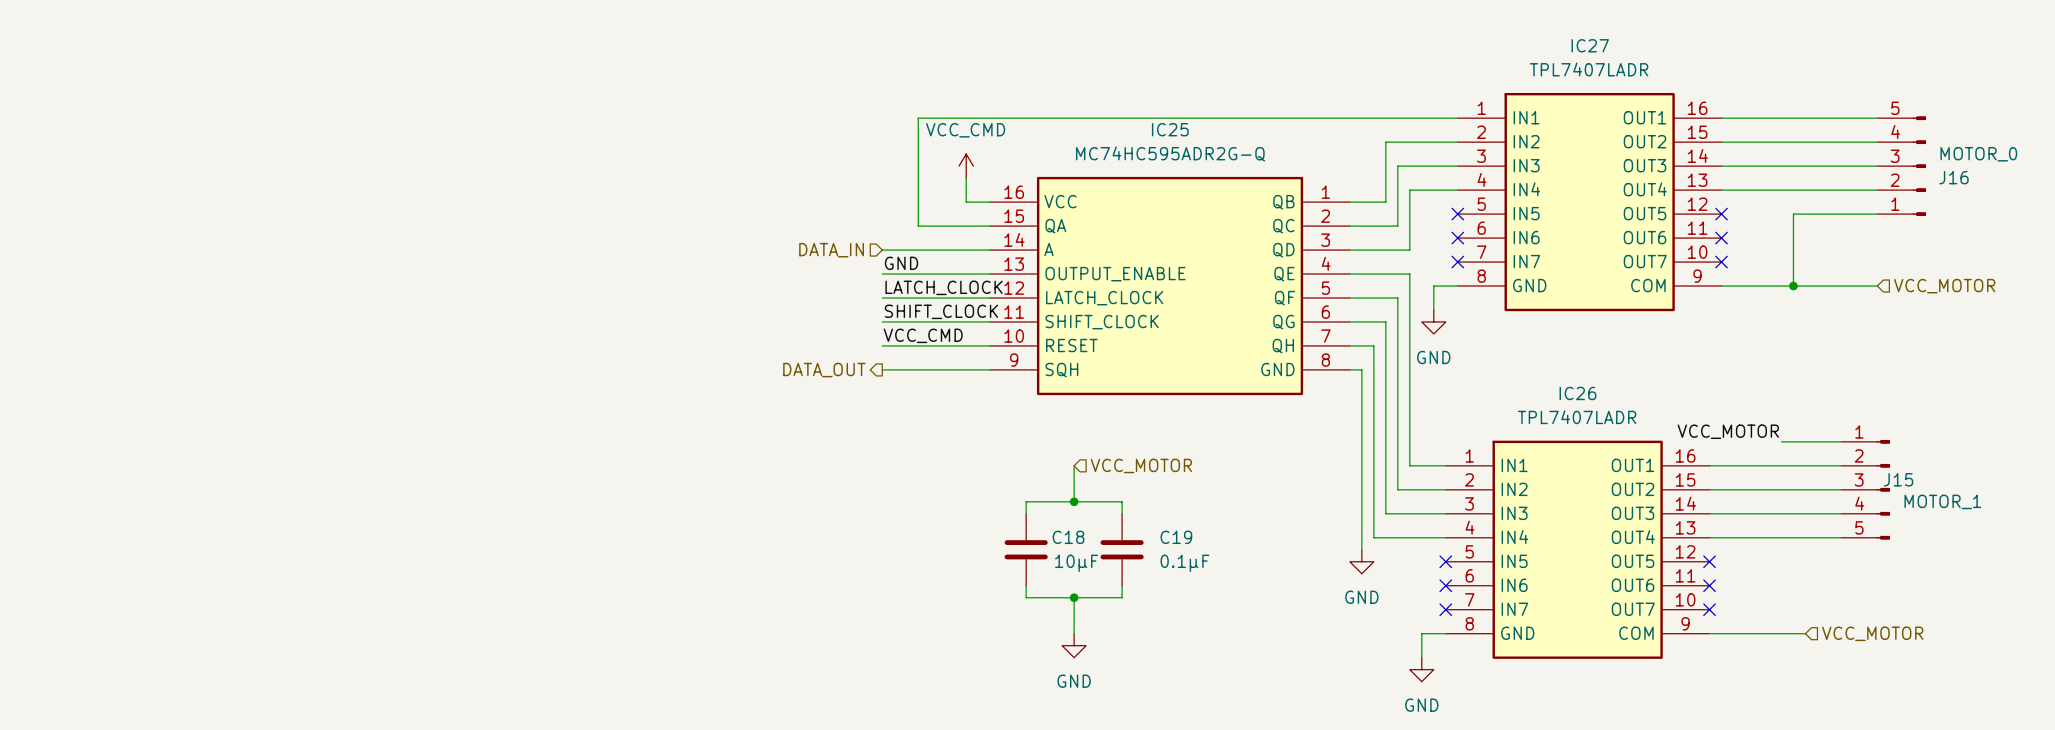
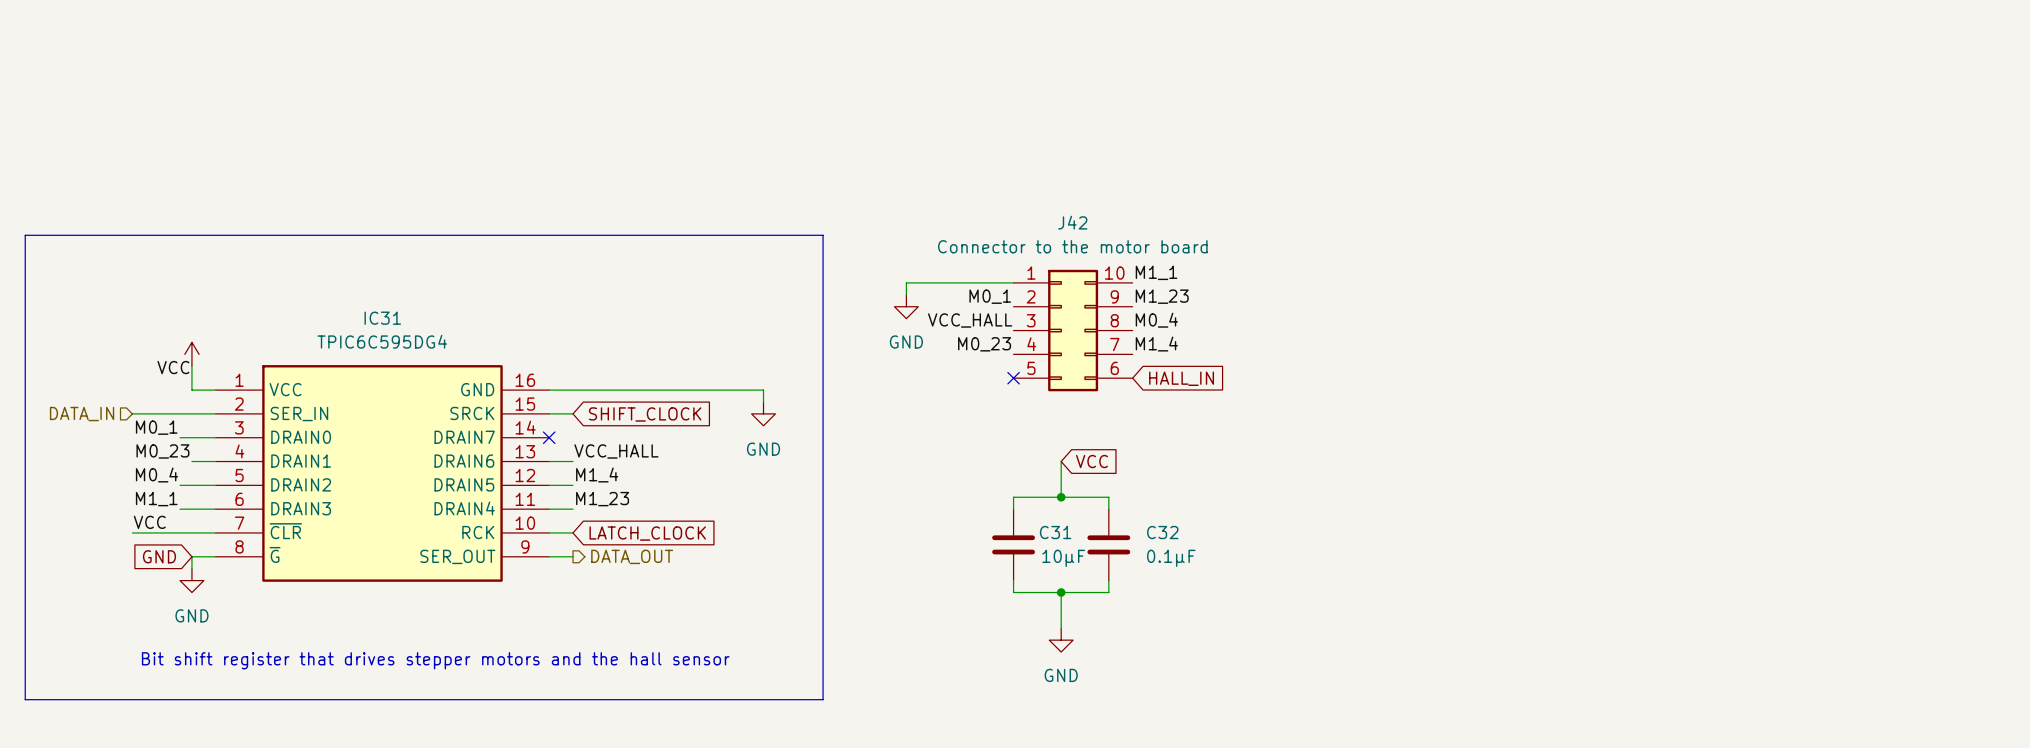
wire: (1457, 118) (918, 118) (918, 226) (990, 226) -> none
wire: (1721, 118) (1877, 118) -> none
wire: (1457, 142) (1385, 142) (1385, 202) (1349, 202) -> none
wire: (1721, 142) (1877, 142) -> none
power symbol: VCC_CMD (966, 166) -> none
wire: (1457, 166) (1397, 166) (1397, 226) (1349, 226) -> none
wire: (1721, 166) (1877, 166) -> none
J16: MOTOR_0 (1901, 166) -> none
wire: (966, 178) (966, 202) (990, 202) -> none
wire: (1457, 190) (1409, 190) (1409, 250) (1349, 250) -> none
wire: (1721, 190) (1877, 190) -> none
IC27: TPL7407LADR (1589, 202) -> none
no-connect mark: (1457, 214) -> none
no-connect mark: (1721, 214) -> none
wire: (1877, 214) (1793, 214) (1793, 286) -> none
line: none -> (25, 235) (823, 235) (823, 699) (25, 699) (25, 235)
no-connect mark: (1457, 238) -> none
no-connect mark: (1721, 238) -> none
hierarchical label: DATA_IN (831, 250) -> none
wire: (882, 250) (990, 250) -> none
no-connect mark: (1457, 262) -> none
no-connect mark: (1721, 262) -> none
label: GND (901, 263) -> none
wire: (882, 274) (990, 274) -> none
wire: (1349, 274) (1409, 274) (1409, 465) (1445, 465) -> none
label: none -> M1_1 (1156, 272)
wire: none -> (1013, 282) (906, 282) (906, 294)
IC25: MC74HC595ADR2G-Q (1170, 286) -> none
wire: (1457, 286) (1433, 286) (1433, 309) -> none
wire: (1721, 286) (1877, 286) -> none
junction: (1793, 286) -> none
hierarchical label: VCC_MOTOR (1944, 286) -> none
label: LATCH_CLOCK (944, 287) -> none
wire: (882, 298) (990, 298) -> none
wire: (1349, 298) (1397, 298) (1397, 489) (1445, 489) -> none
label: none -> M0_1 (990, 296)
label: none -> M1_23 (1162, 296)
power symbol: none -> GND (906, 306)
label: SHIFT_CLOCK (941, 311) -> none
wire: (882, 321) (990, 321) -> none
wire: (1349, 321) (1385, 321) (1385, 513) (1445, 513) -> none
power symbol: GND (1433, 321) -> none
label: none -> VCC_HALL (970, 320)
label: none -> M0_4 (1156, 320)
J42: none -> Connector to the motor board (1073, 330)
label: VCC_CMD (923, 335) -> none
wire: (882, 345) (990, 345) -> none
wire: (1349, 345) (1373, 345) (1373, 537) (1445, 537) -> none
label: none -> M0_23 (984, 344)
label: none -> M1_4 (1156, 344)
power symbol: none -> (191, 354)
wire: none -> (191, 366) (191, 390) (215, 390)
wire: (882, 369) (990, 369) -> none
wire: (1349, 369) (1361, 369) (1361, 549) -> none
hierarchical label: DATA_OUT (824, 370) -> none
label: none -> VCC (173, 367)
no-connect mark: none -> (1013, 378)
global label: none -> HALL_IN (1181, 378)
wire: none -> (549, 390) (763, 390) (763, 401)
wire: none -> (132, 413) (215, 413)
wire: none -> (549, 413) (572, 413)
power symbol: none -> GND (763, 413)
hierarchical label: none -> DATA_IN (82, 414)
global label: none -> SHIFT_CLOCK (645, 414)
label: none -> M0_1 (156, 427)
label: VCC_MOTOR (1728, 431) -> none
wire: none -> (180, 437) (215, 437)
no-connect mark: none -> (549, 437)
wire: (1781, 441) (1841, 441) -> none
label: none -> M0_23 (162, 451)
label: none -> VCC_HALL (616, 451)
wire: none -> (191, 461) (215, 461)
wire: none -> (549, 461) (572, 461)
global label: none -> VCC (1091, 461)
hierarchical label: VCC_MOTOR (1141, 465) -> none
wire: (1709, 465) (1841, 465) -> none
IC31: none -> TPIC6C595DG4 (382, 473)
label: none -> M0_4 (157, 475)
label: none -> M1_4 (597, 475)
wire: none -> (180, 485) (215, 485)
wire: none -> (549, 485) (572, 485)
wire: (1709, 489) (1841, 489) -> none
J15: MOTOR_1 (1865, 489) -> none
label: none -> M1_1 (156, 499)
label: none -> M1_23 (602, 499)
wire: none -> (180, 509) (215, 509)
wire: none -> (549, 509) (572, 509)
wire: (1709, 513) (1841, 513) -> none
label: none -> VCC (149, 522)
wire: none -> (132, 532) (215, 532)
wire: none -> (549, 532) (572, 532)
C18 name: C18 (1068, 537) -> C31 (1055, 532)
C19 name: C19 (1176, 537) -> C32 (1162, 532)
wire: (1709, 537) (1841, 537) -> none
global label: none -> LATCH_CLOCK (647, 533)
IC26: TPL7407LADR (1577, 549) -> none
global label: none -> GND (159, 556)
wire: none -> (215, 556) (191, 556) (191, 568)
wire: none -> (549, 556) (572, 556)
hierarchical label: none -> DATA_OUT (632, 556)
power symbol: GND (1361, 561) -> none
no-connect mark: (1445, 561) -> none
no-connect mark: (1709, 561) -> none
power symbol: none -> GND (191, 580)
no-connect mark: (1445, 585) -> none
no-connect mark: (1709, 585) -> none
no-connect mark: (1445, 609) -> none
no-connect mark: (1709, 609) -> none
wire: (1445, 633) (1421, 633) (1421, 657) -> none
wire: (1709, 633) (1805, 633) -> none
hierarchical label: VCC_MOTOR (1872, 633) -> none
text: none -> Bit shift register that drives stepper motors and the hall sensor (435, 660)
power symbol: GND (1421, 669) -> none

